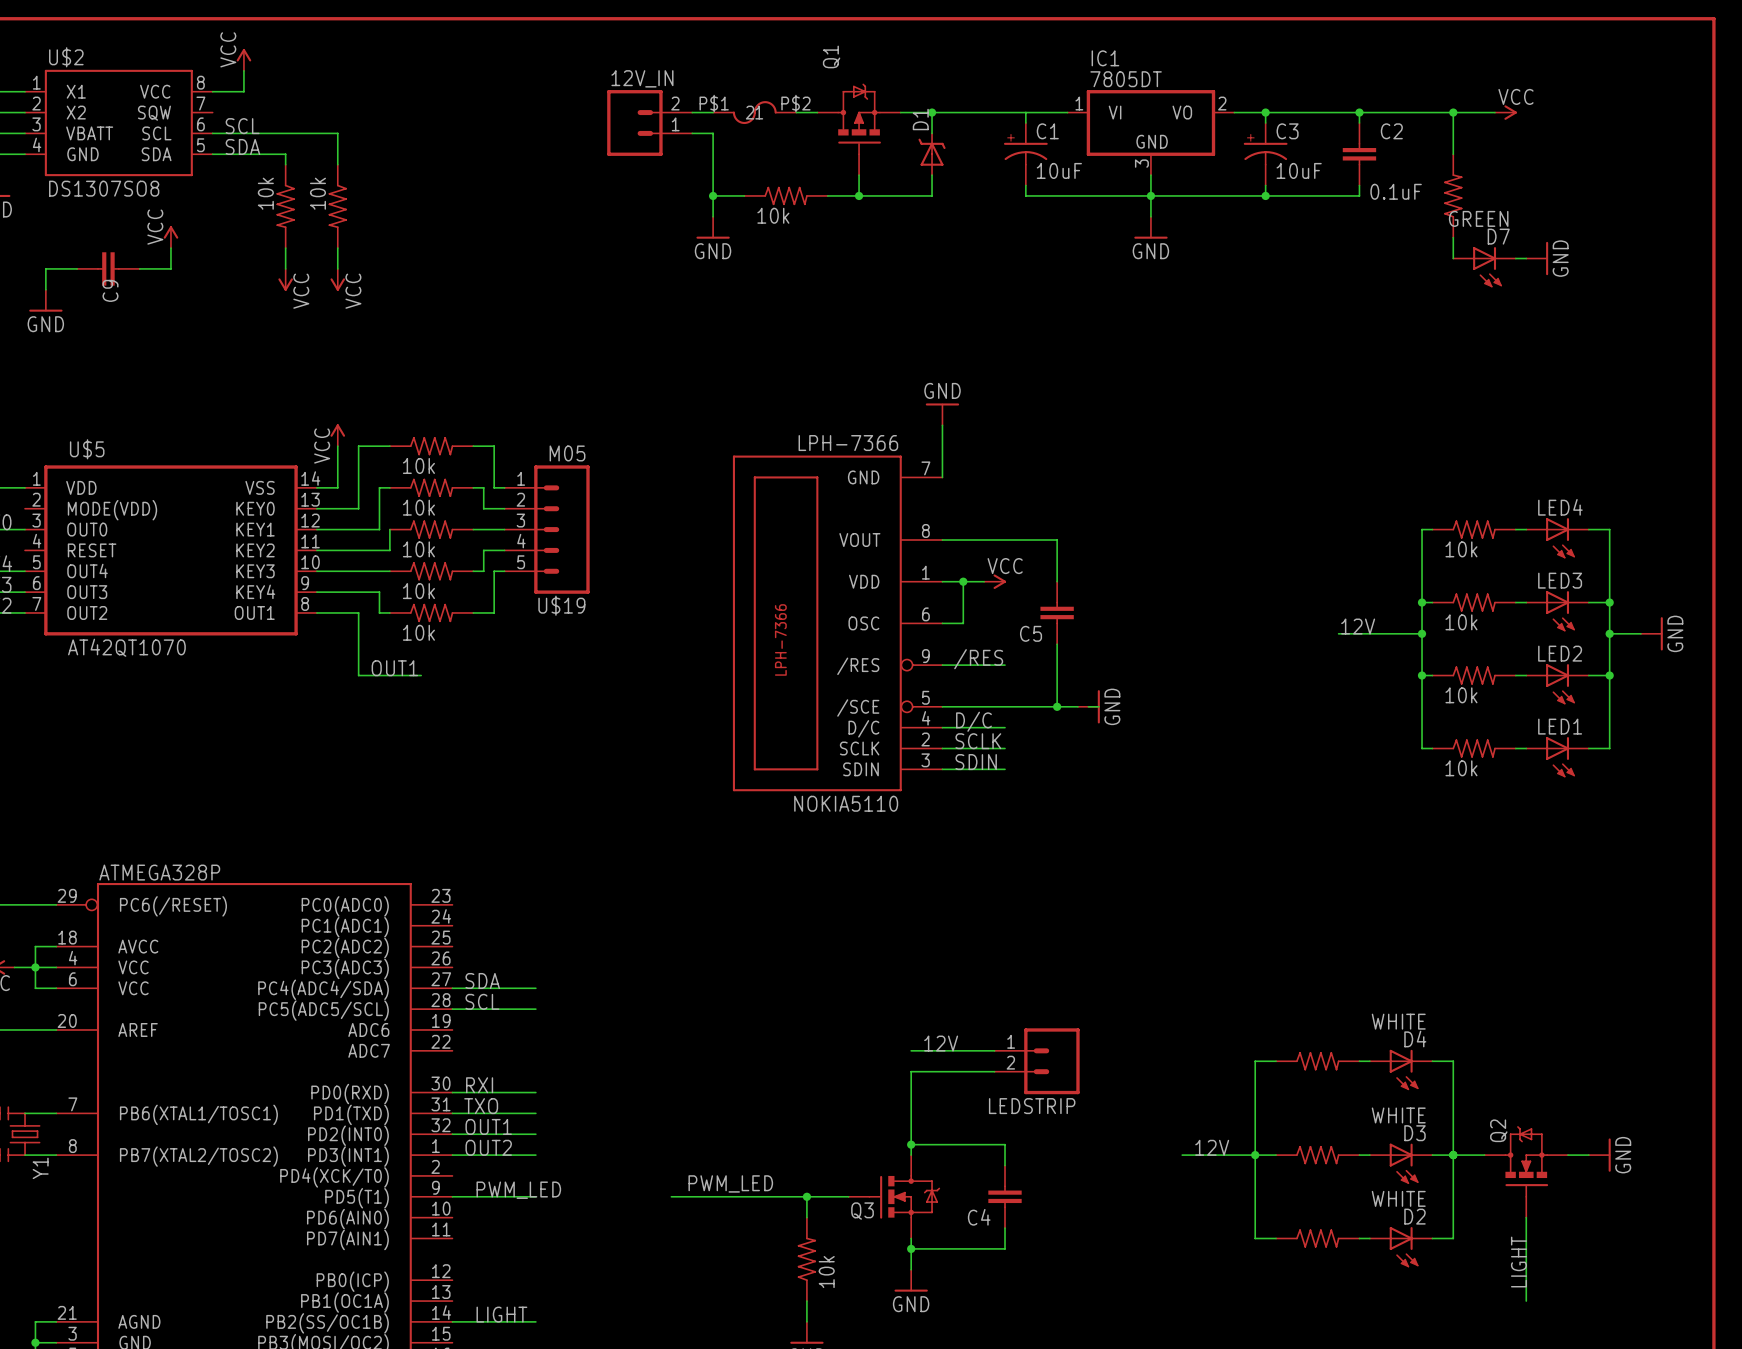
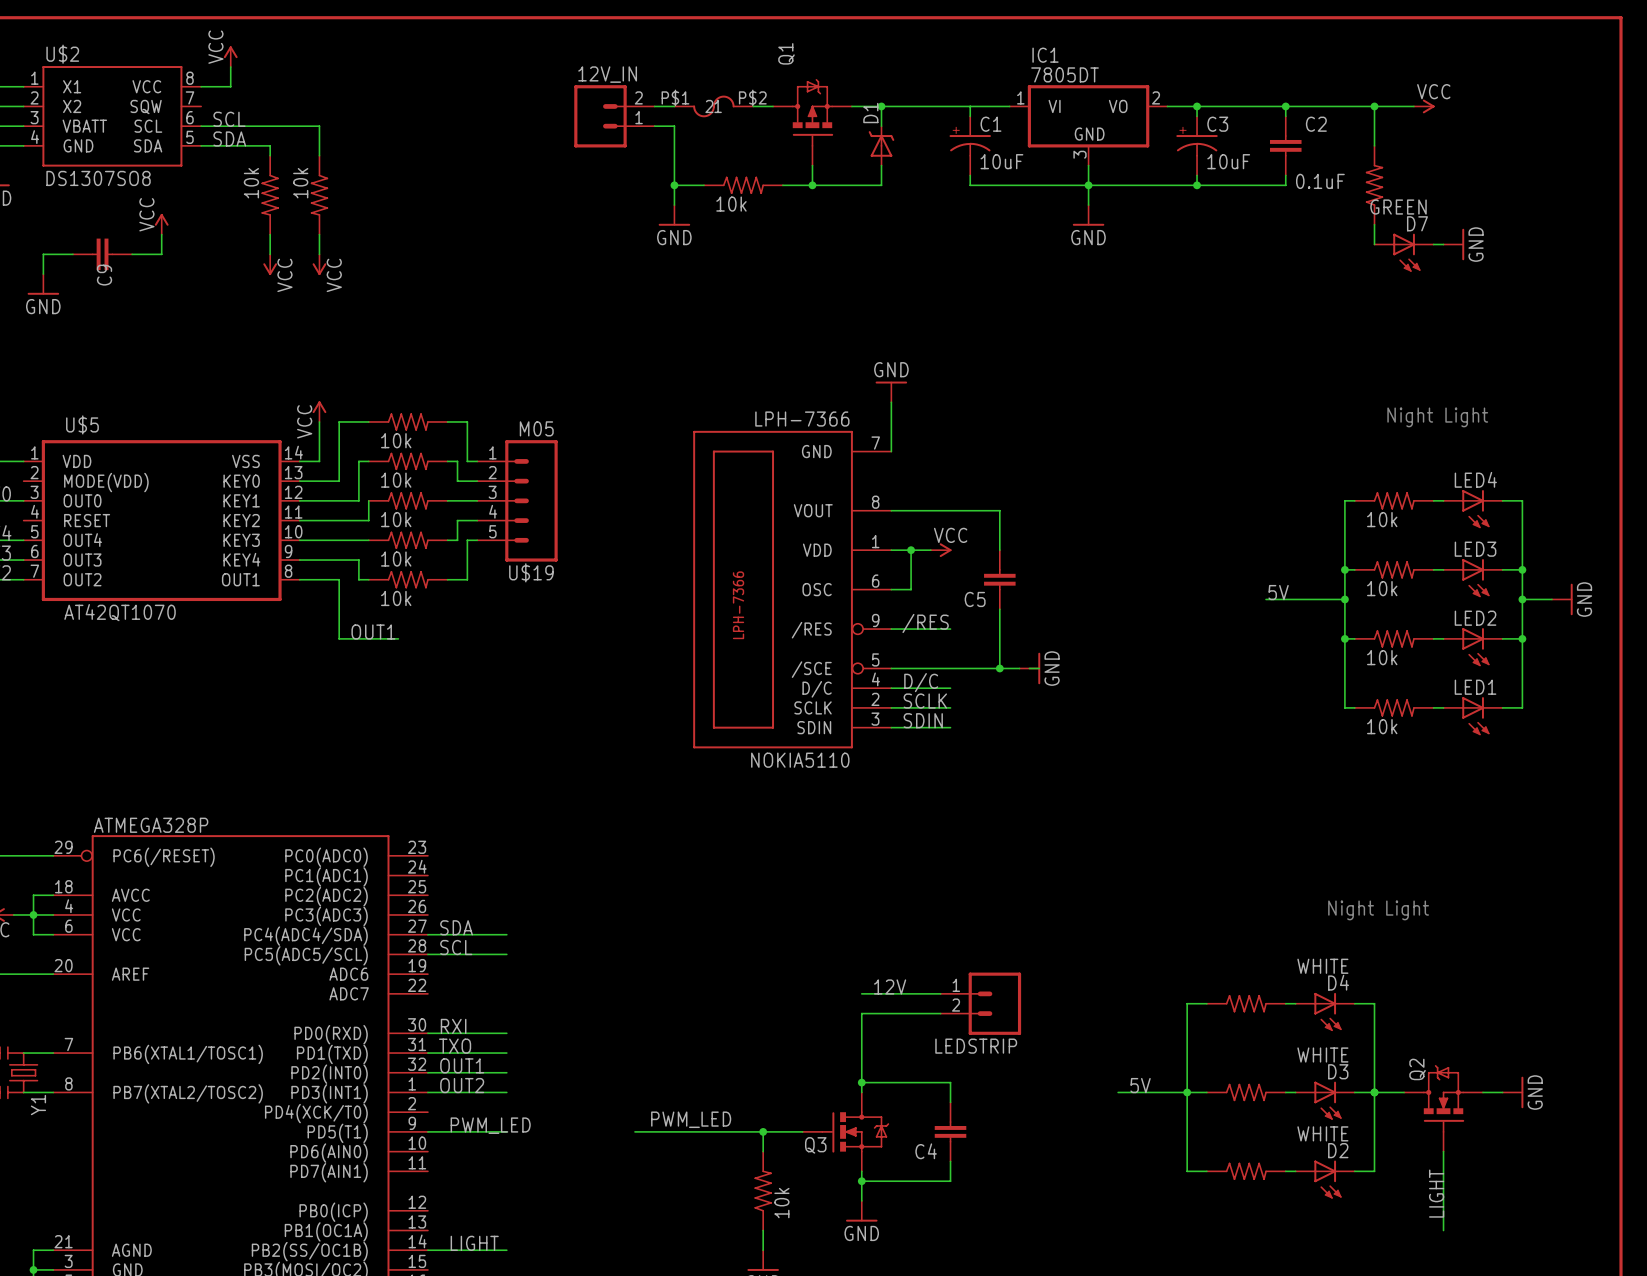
text: none -> Night Light (1437, 417)
label: 12V (1358, 626) -> 5V (1278, 592)
text: none -> Night Light (1378, 910)
label: 12V (1212, 1147) -> 5V (1140, 1085)

